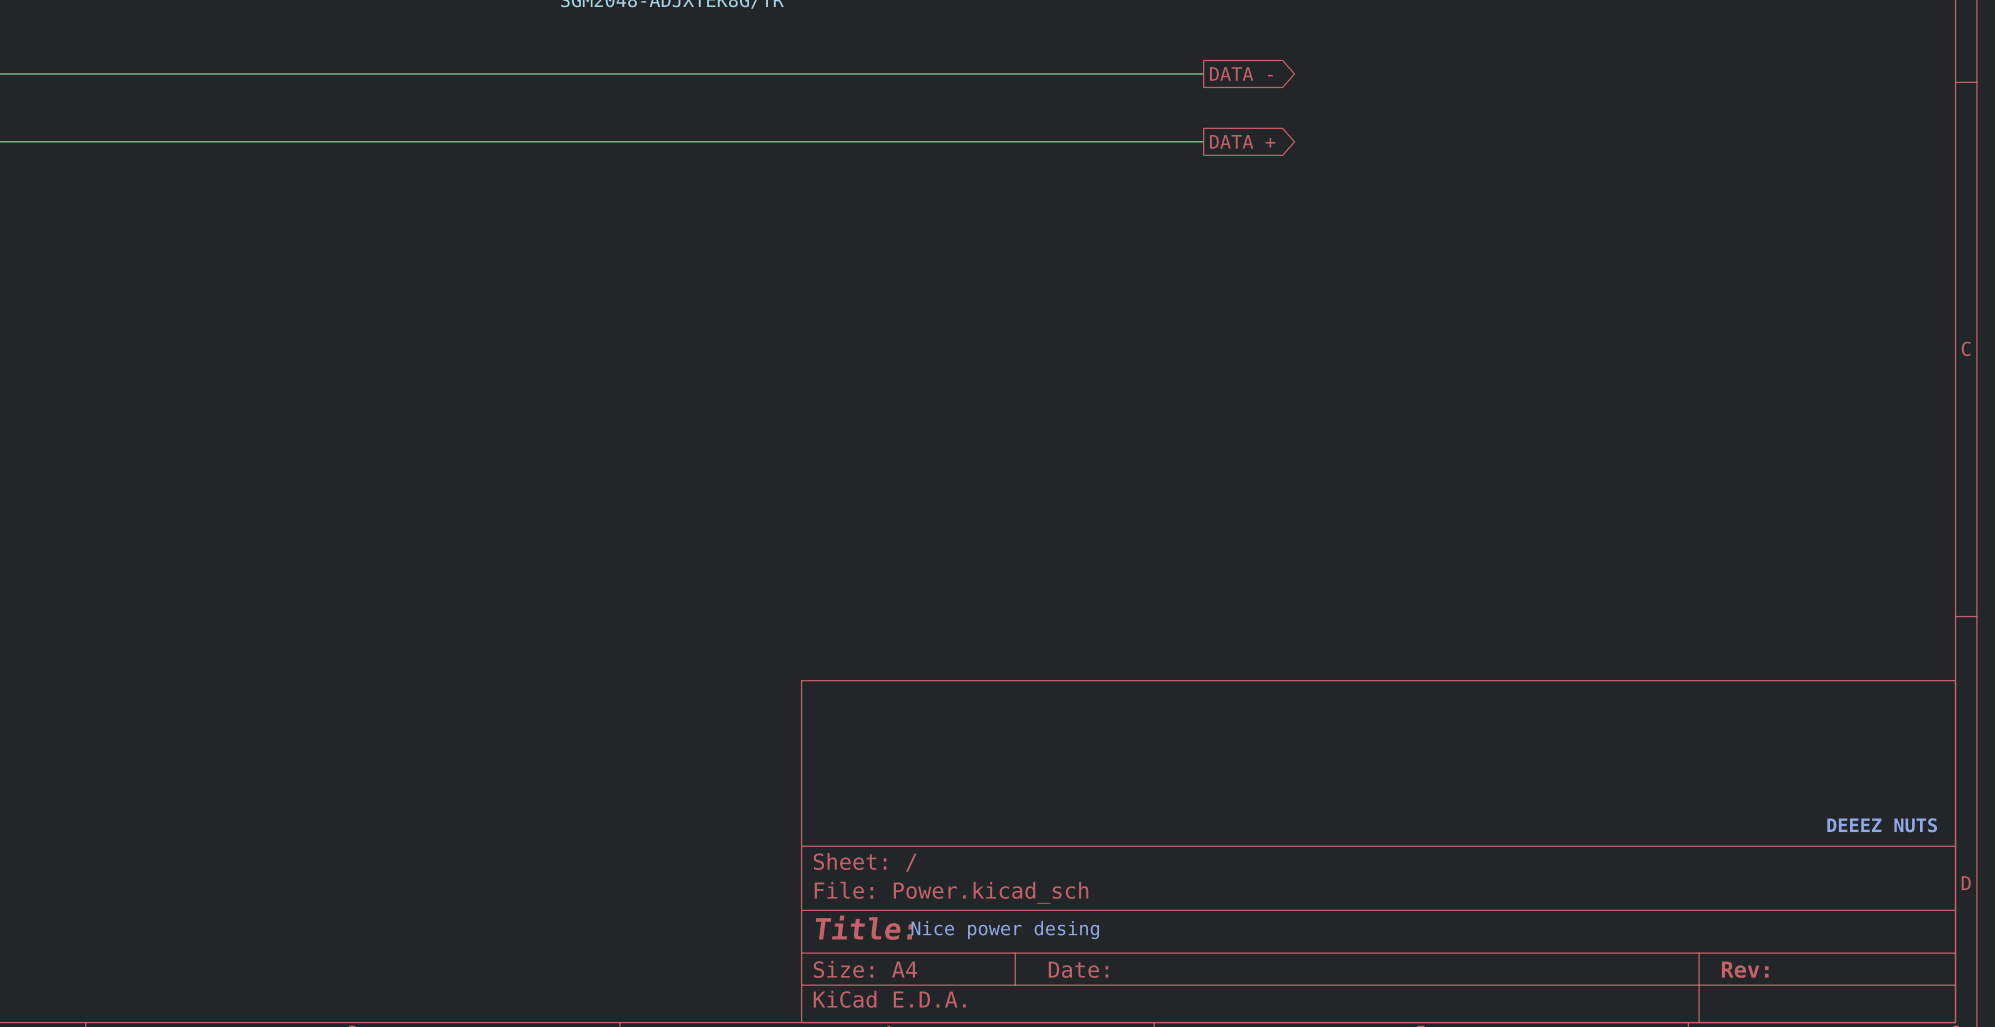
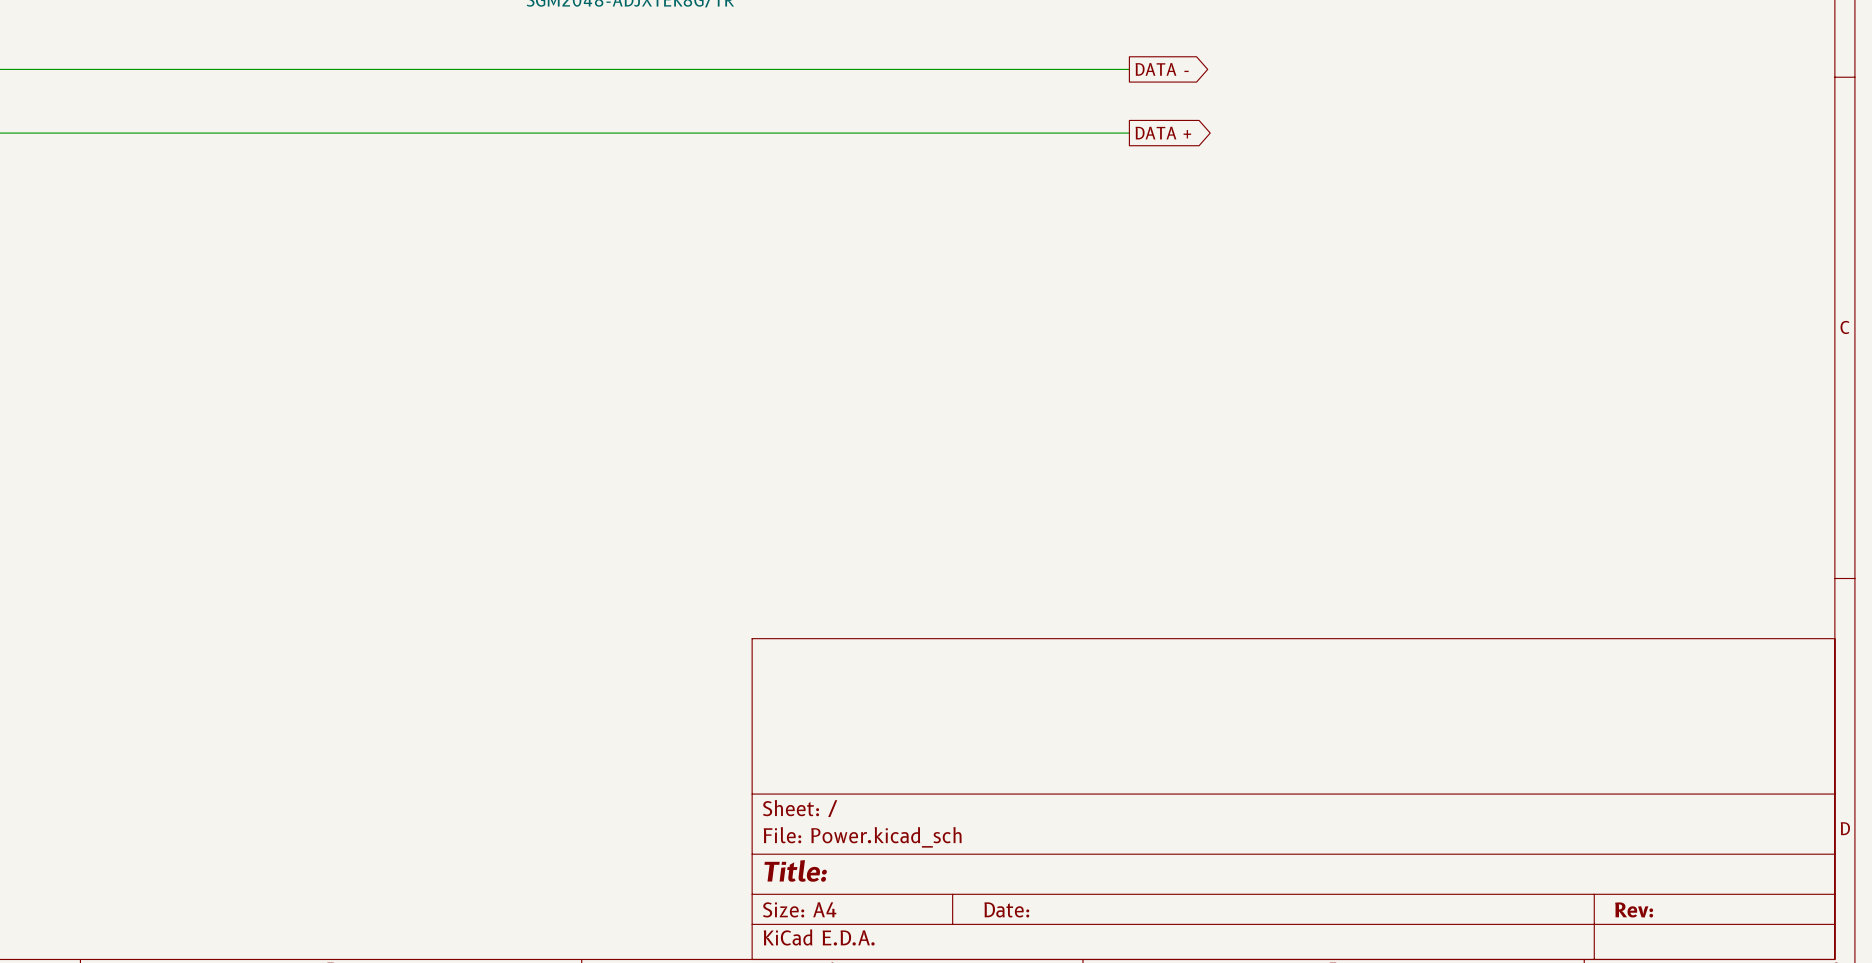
text: DEEEZ NUTS (1882, 825) -> none
text: Nice power desing (1005, 930) -> none

